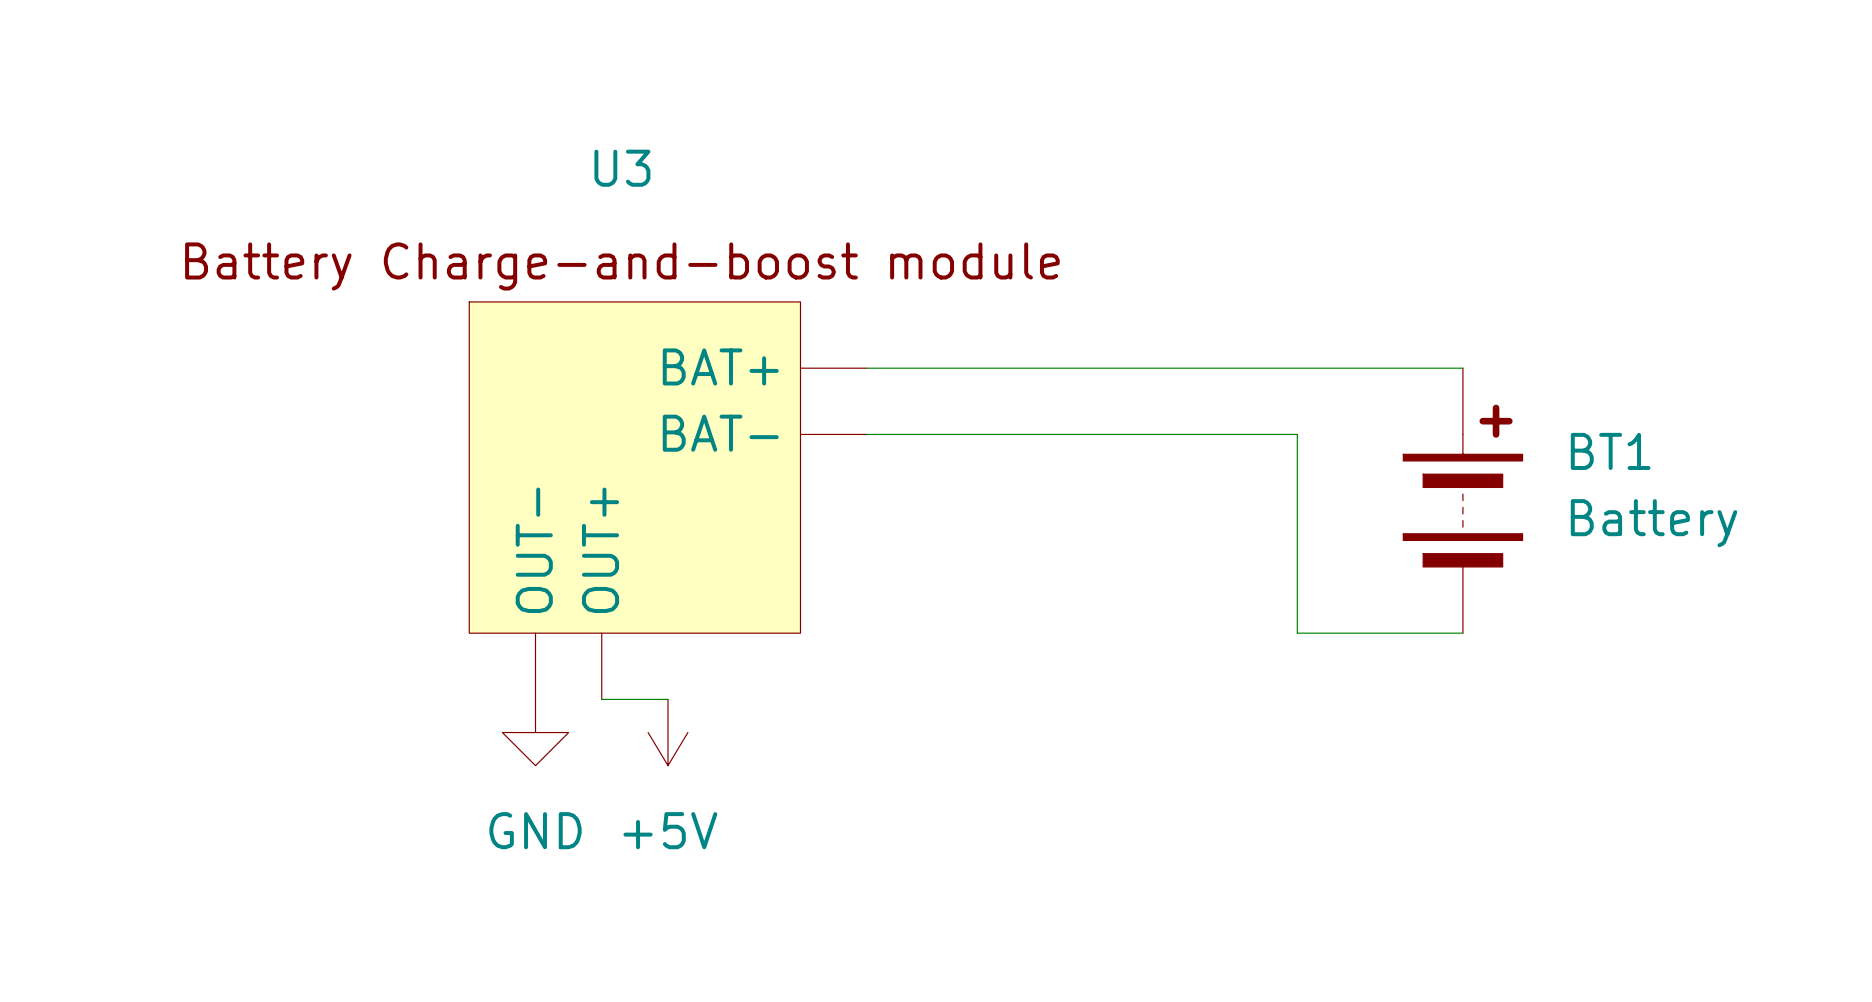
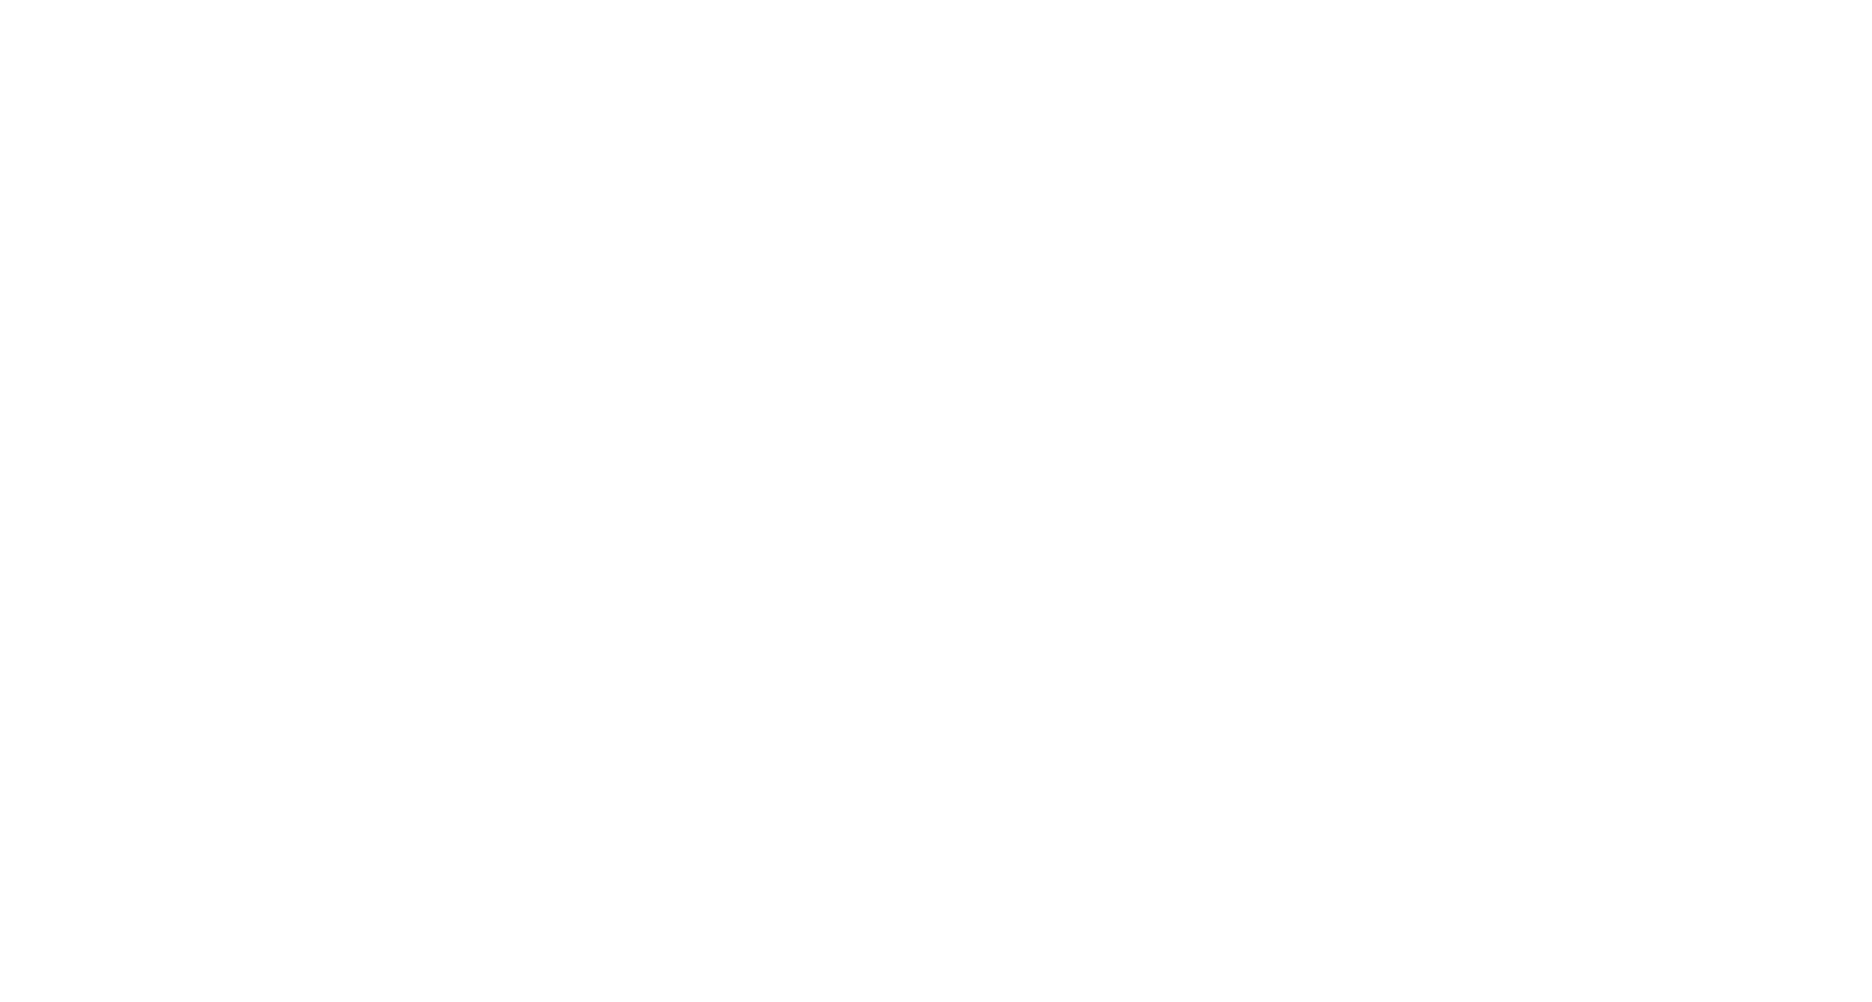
wire: (866, 368) (1462, 368) -> none
wire: (866, 434) (1297, 434) (1297, 633) (1462, 633) -> none
U3: (667, 500) -> none
BT1: Battery (1462, 500) -> none
wire: (601, 699) (667, 699) -> none
power symbol: GND (535, 732) -> none
power symbol: +5V (667, 732) -> none

